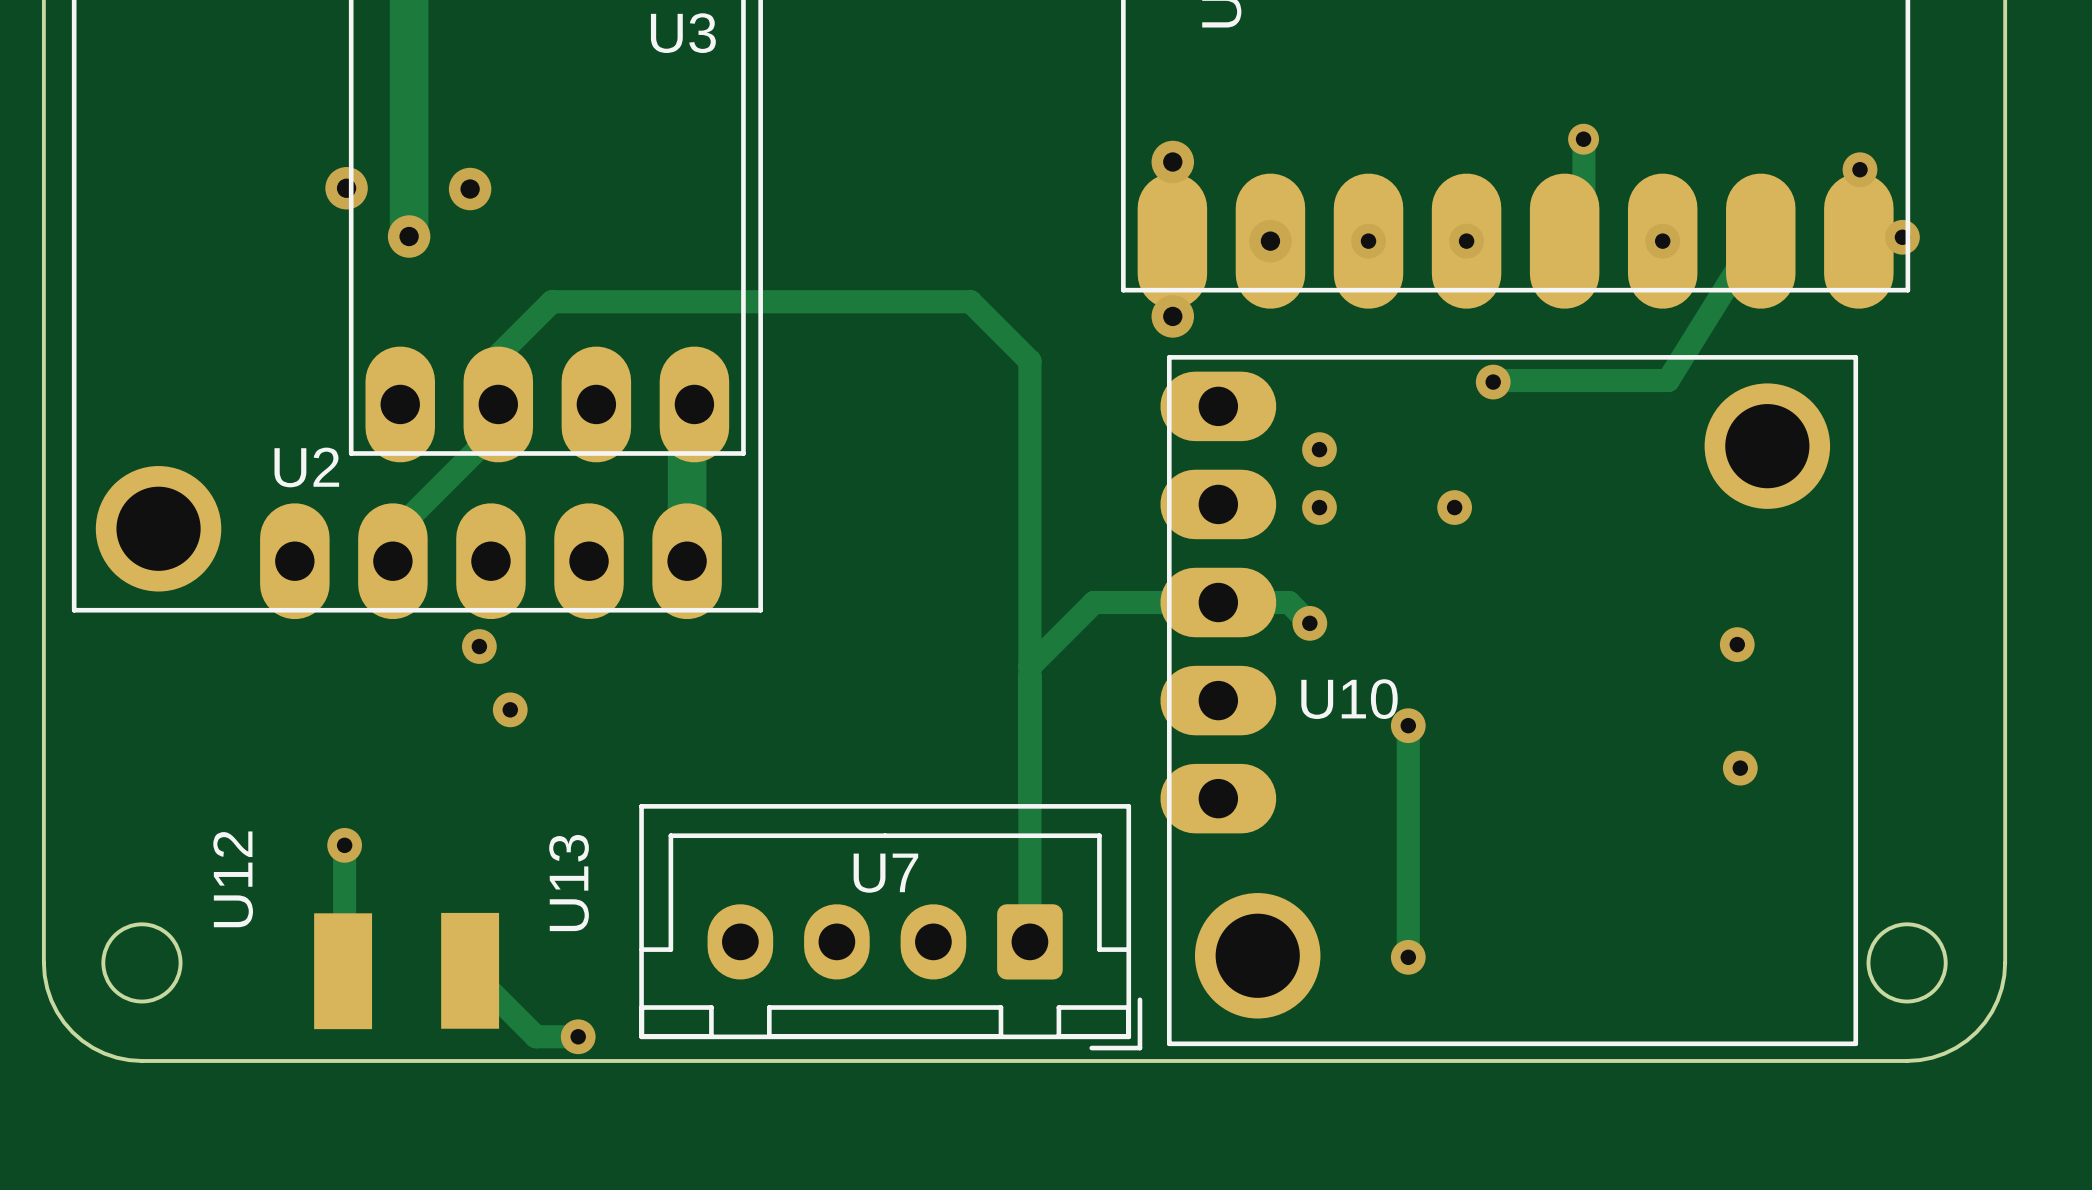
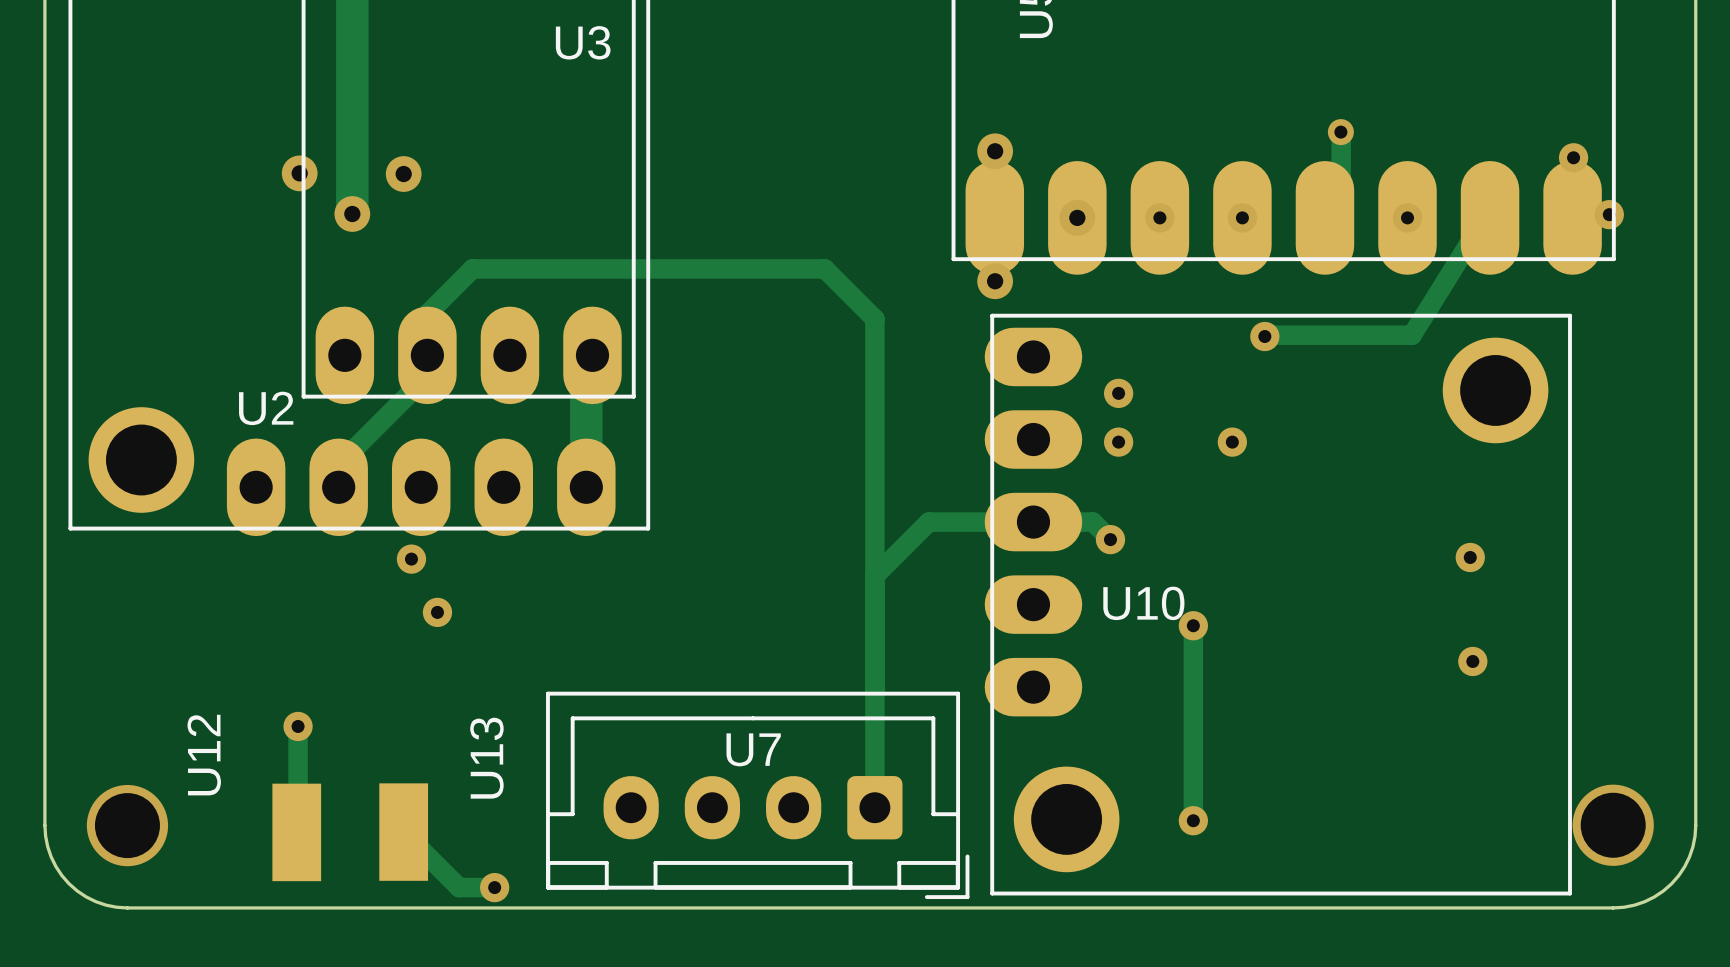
round board edge: [101, 922, 183, 1004] -> none
round board edge: [1866, 922, 1948, 1004] -> none
via: none -> (1613, 825)
via: none -> (127, 825)

